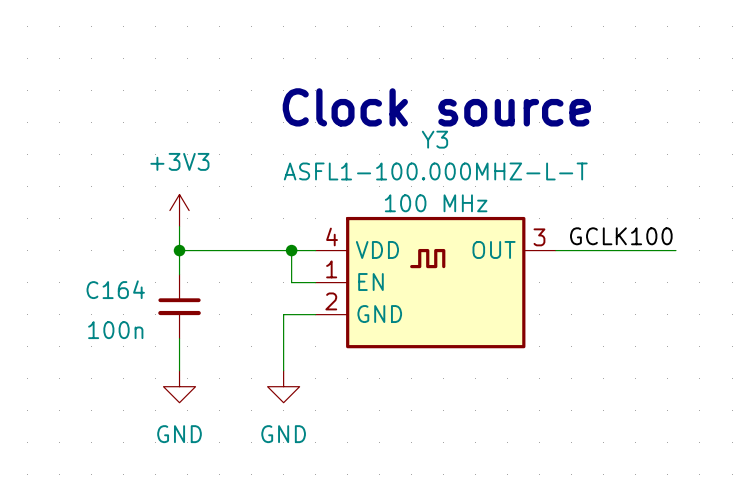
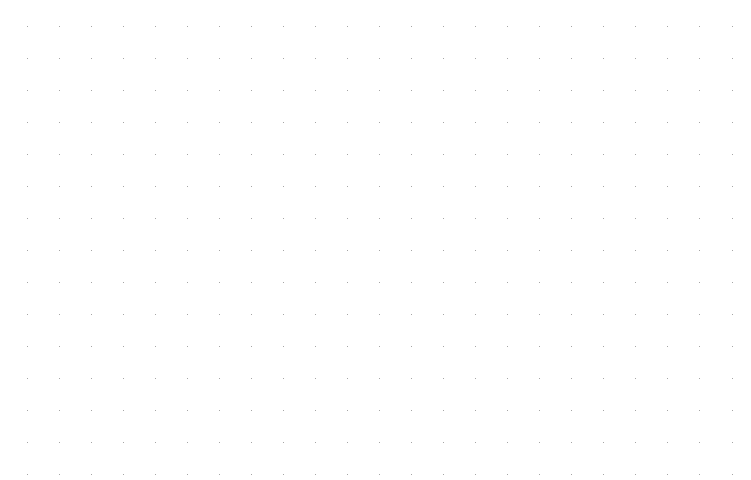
text: Clock source (436, 107) -> none
power symbol: +3V3 (179, 210) -> none
wire: (179, 226) (179, 274) -> none
label: GCLK100 (621, 236) -> none
wire: (179, 250) (315, 250) -> none
junction: (179, 250) -> none
wire: (291, 250) (291, 282) (315, 282) -> none
junction: (291, 250) -> none
wire: (555, 250) (675, 250) -> none
Y3: (435, 282) -> none
C164: (179, 306) -> none
wire: (315, 314) (283, 314) (283, 370) -> none
wire: (179, 338) (179, 370) -> none
power symbol: GND (179, 386) -> none
power symbol: GND (283, 386) -> none

